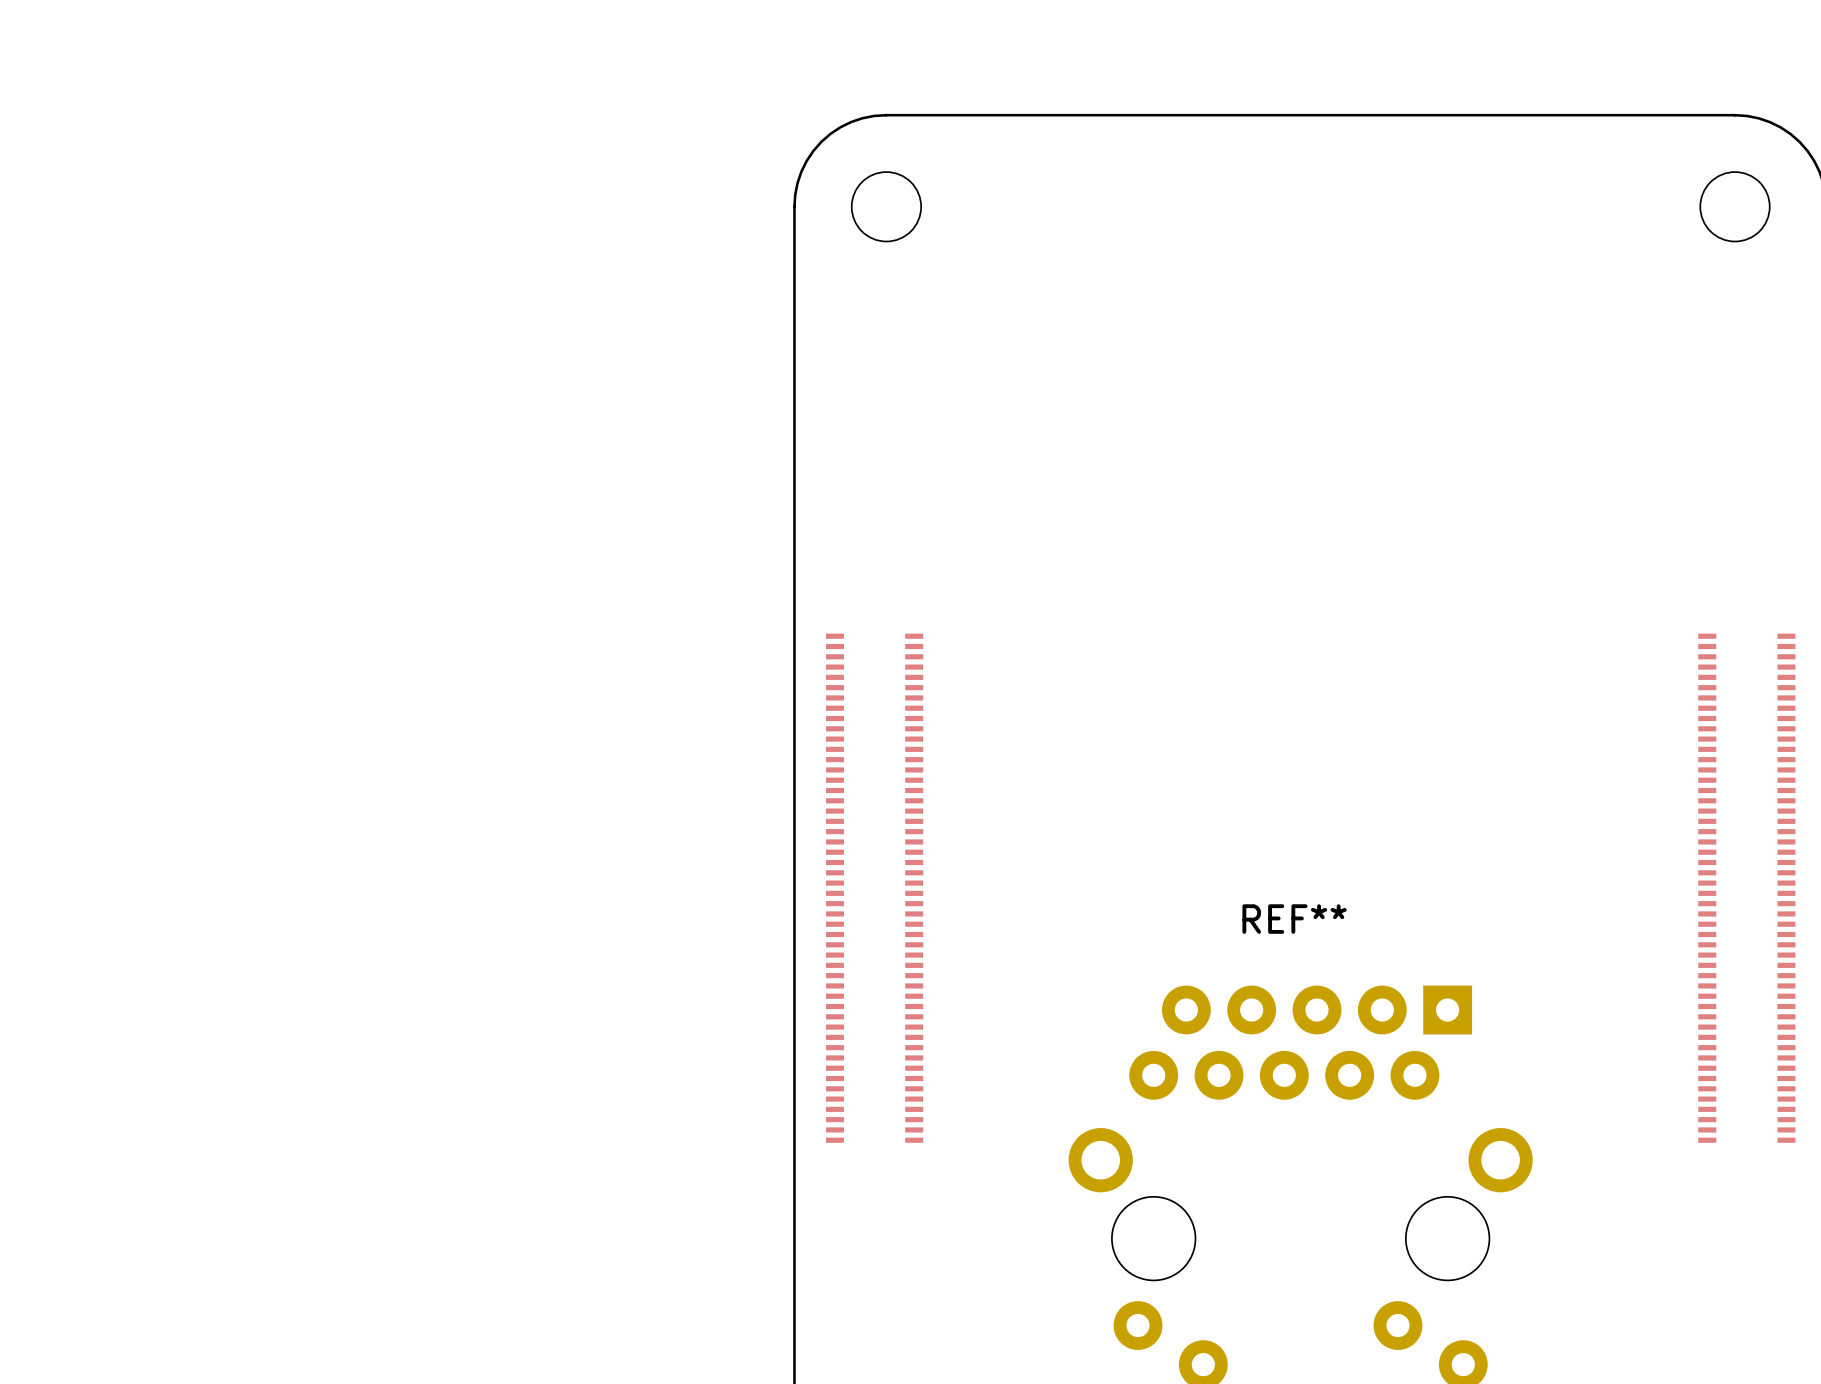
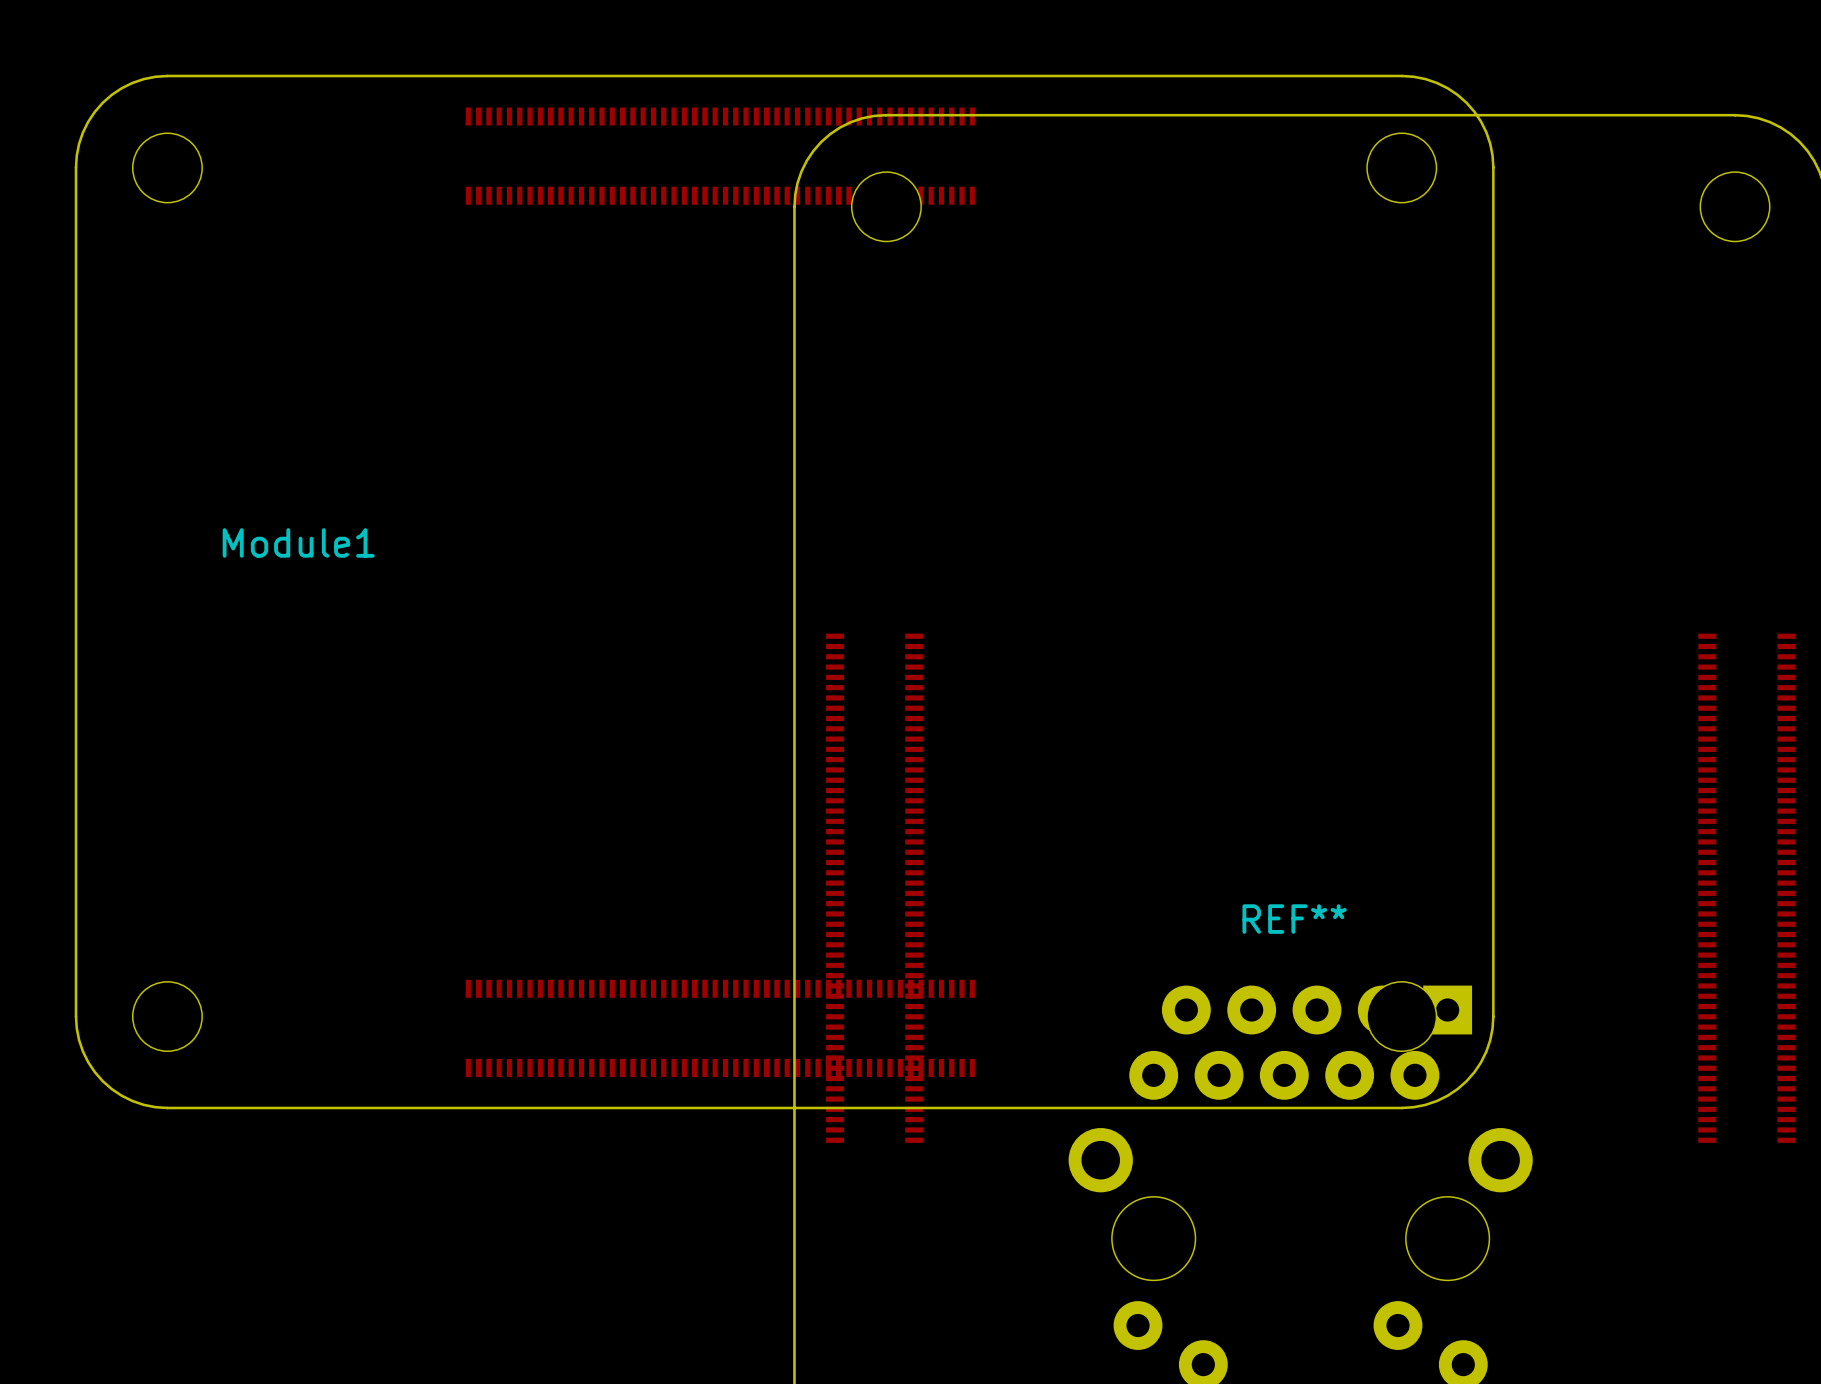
board edge: none -> (1401, 76) (167, 76) (143, 79) (132, 82) (111, 94) (94, 111) (88, 121) (79, 143) (76, 167) (76, 1016) (76, 1028) (82, 1051) (94, 1072) (111, 1089) (132, 1101) (143, 1104) (167, 1107) (1401, 1107) (1413, 1107) (1436, 1101) (1457, 1089) (1466, 1081) (1481, 1062) (1490, 1040) (1493, 1016) (1493, 167) (1490, 143) (1486, 132) (1474, 111) (1466, 102) (1447, 88) (1436, 82) (1425, 79) (1401, 76)
Module1: none -> (784, 592)

